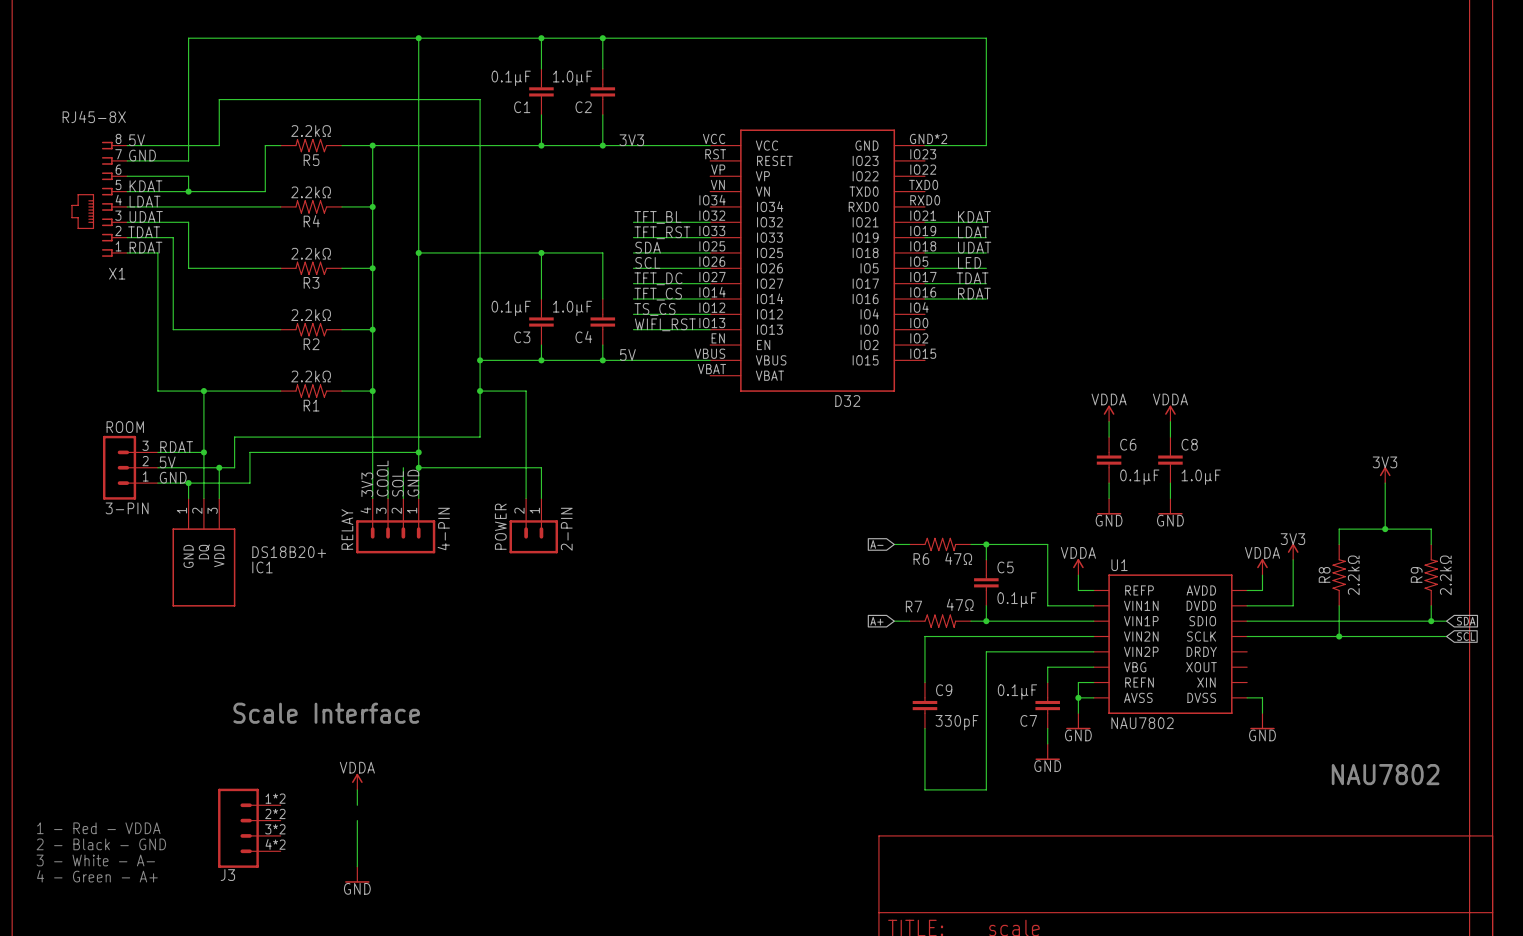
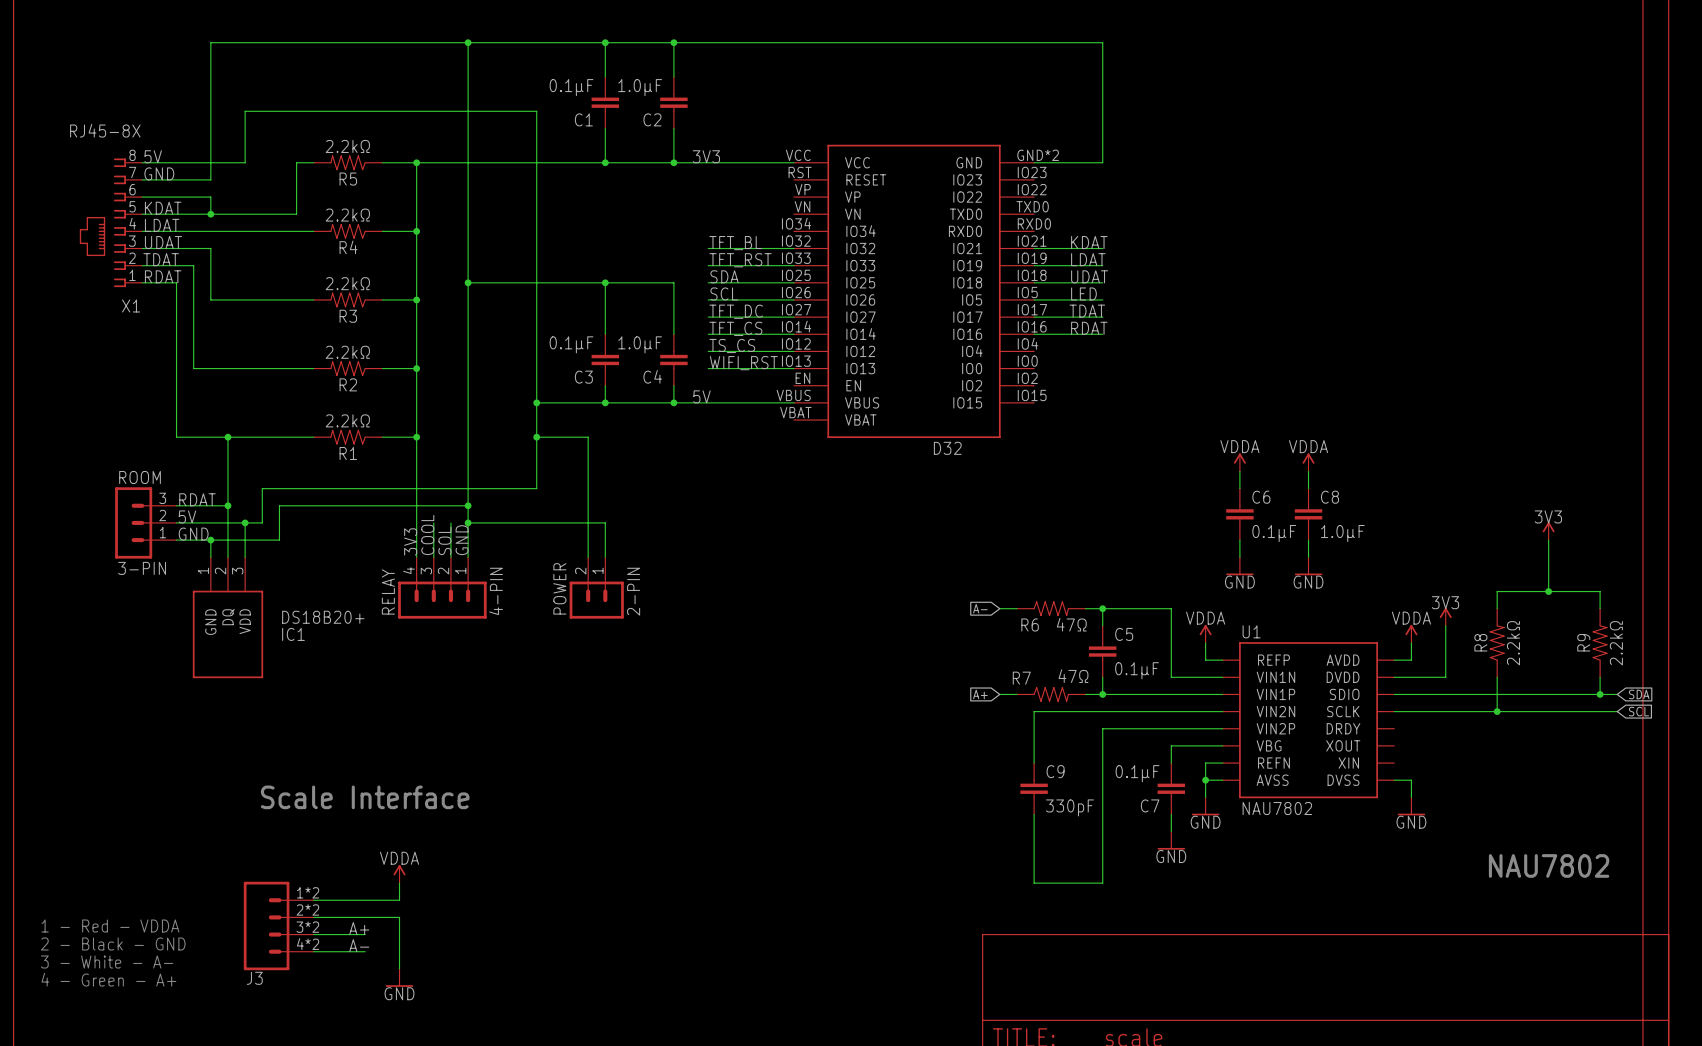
wire: none -> (313, 900) (399, 900)
wire: none -> (313, 917) (399, 917)
label: none -> A+ (359, 928)
wire: none -> (313, 934) (365, 934)
label: none -> A- (359, 945)
wire: none -> (313, 951) (365, 951)

